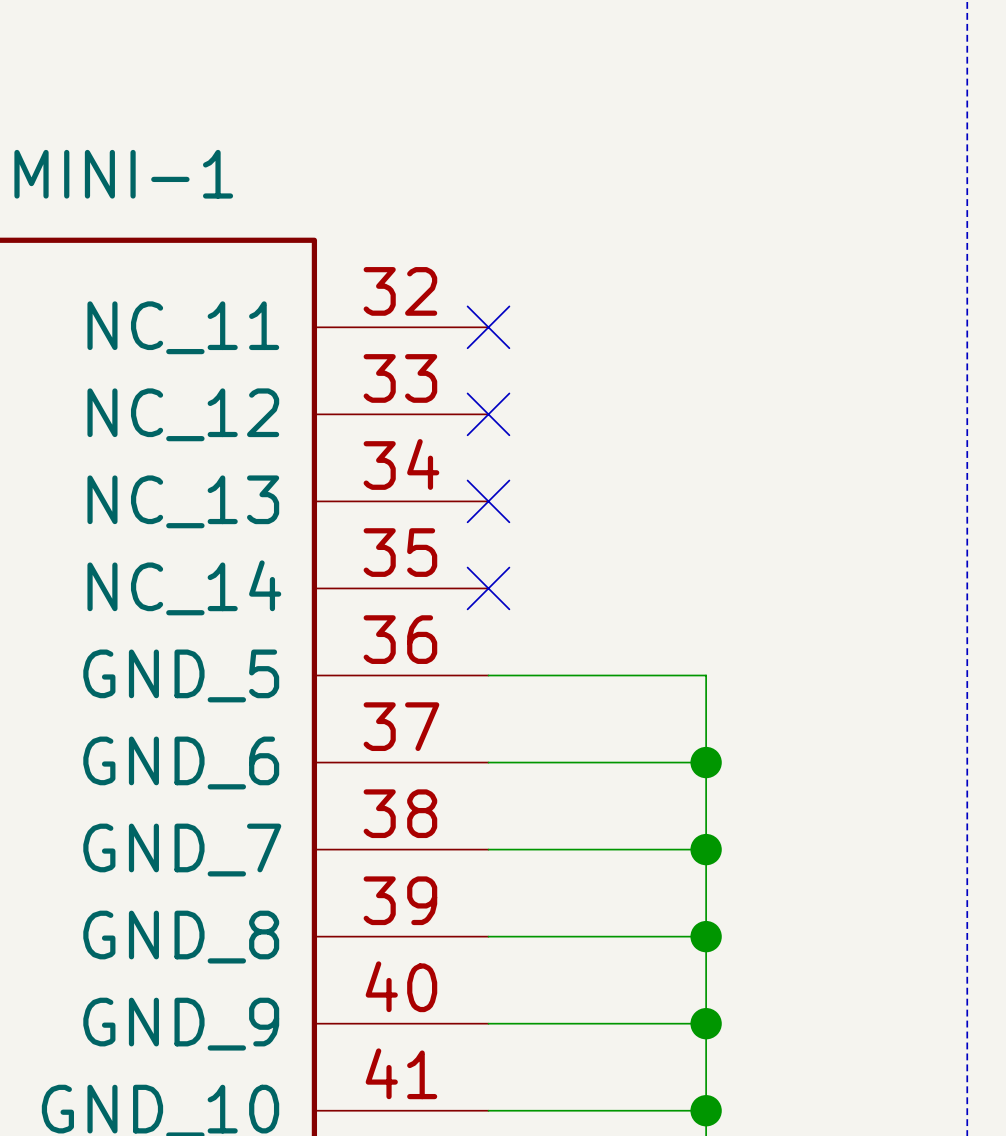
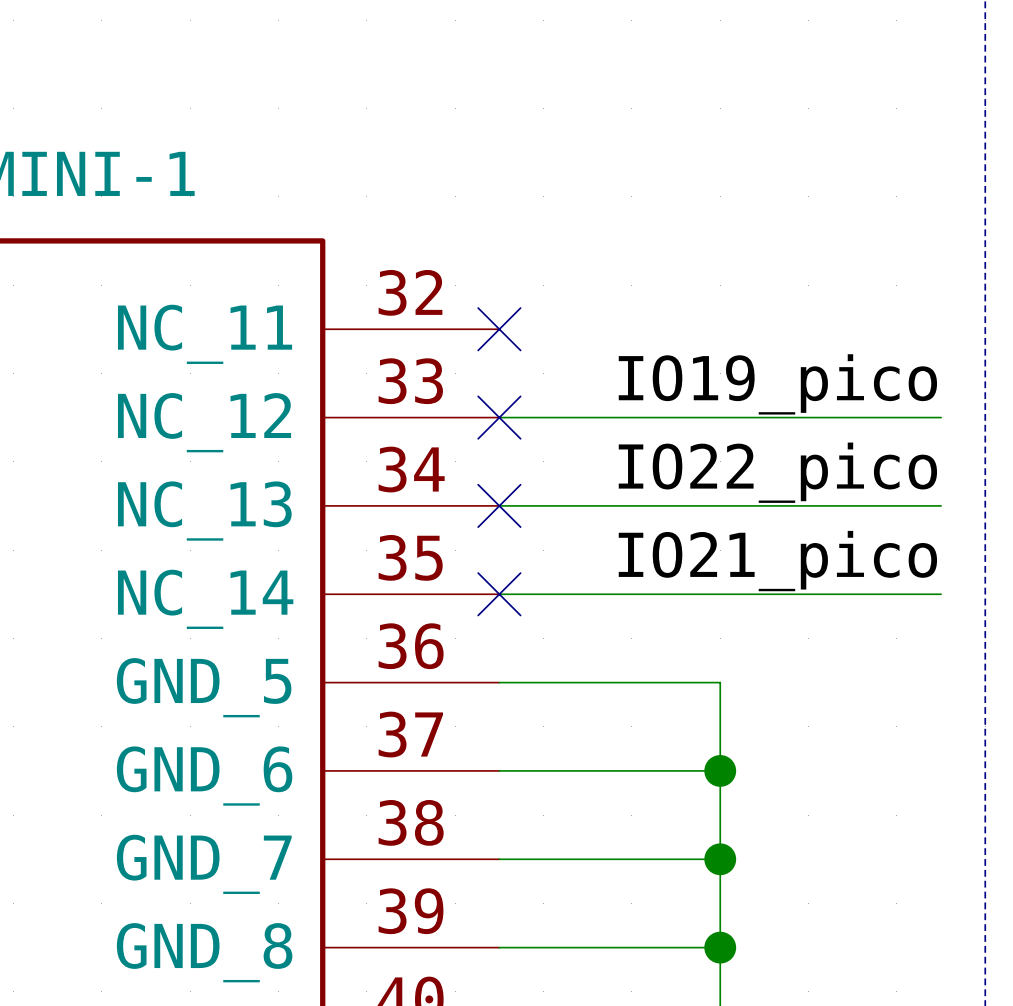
label: none -> IO19_pico (777, 384)
wire: none -> (499, 417) (941, 417)
label: none -> IO22_pico (777, 472)
wire: none -> (499, 505) (941, 505)
label: none -> IO21_pico (777, 561)
wire: none -> (499, 594) (941, 594)

